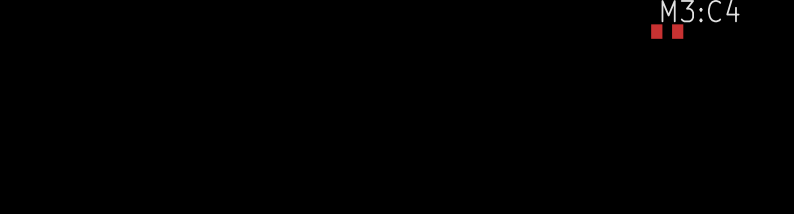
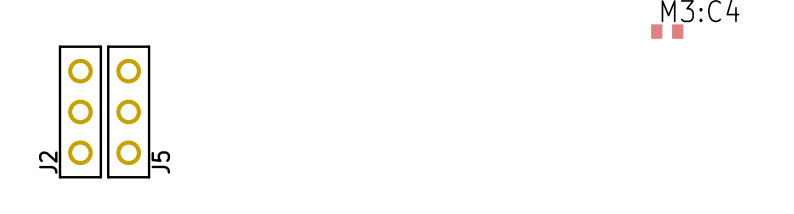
J2: none -> (80, 111)
J5: none -> (128, 111)

